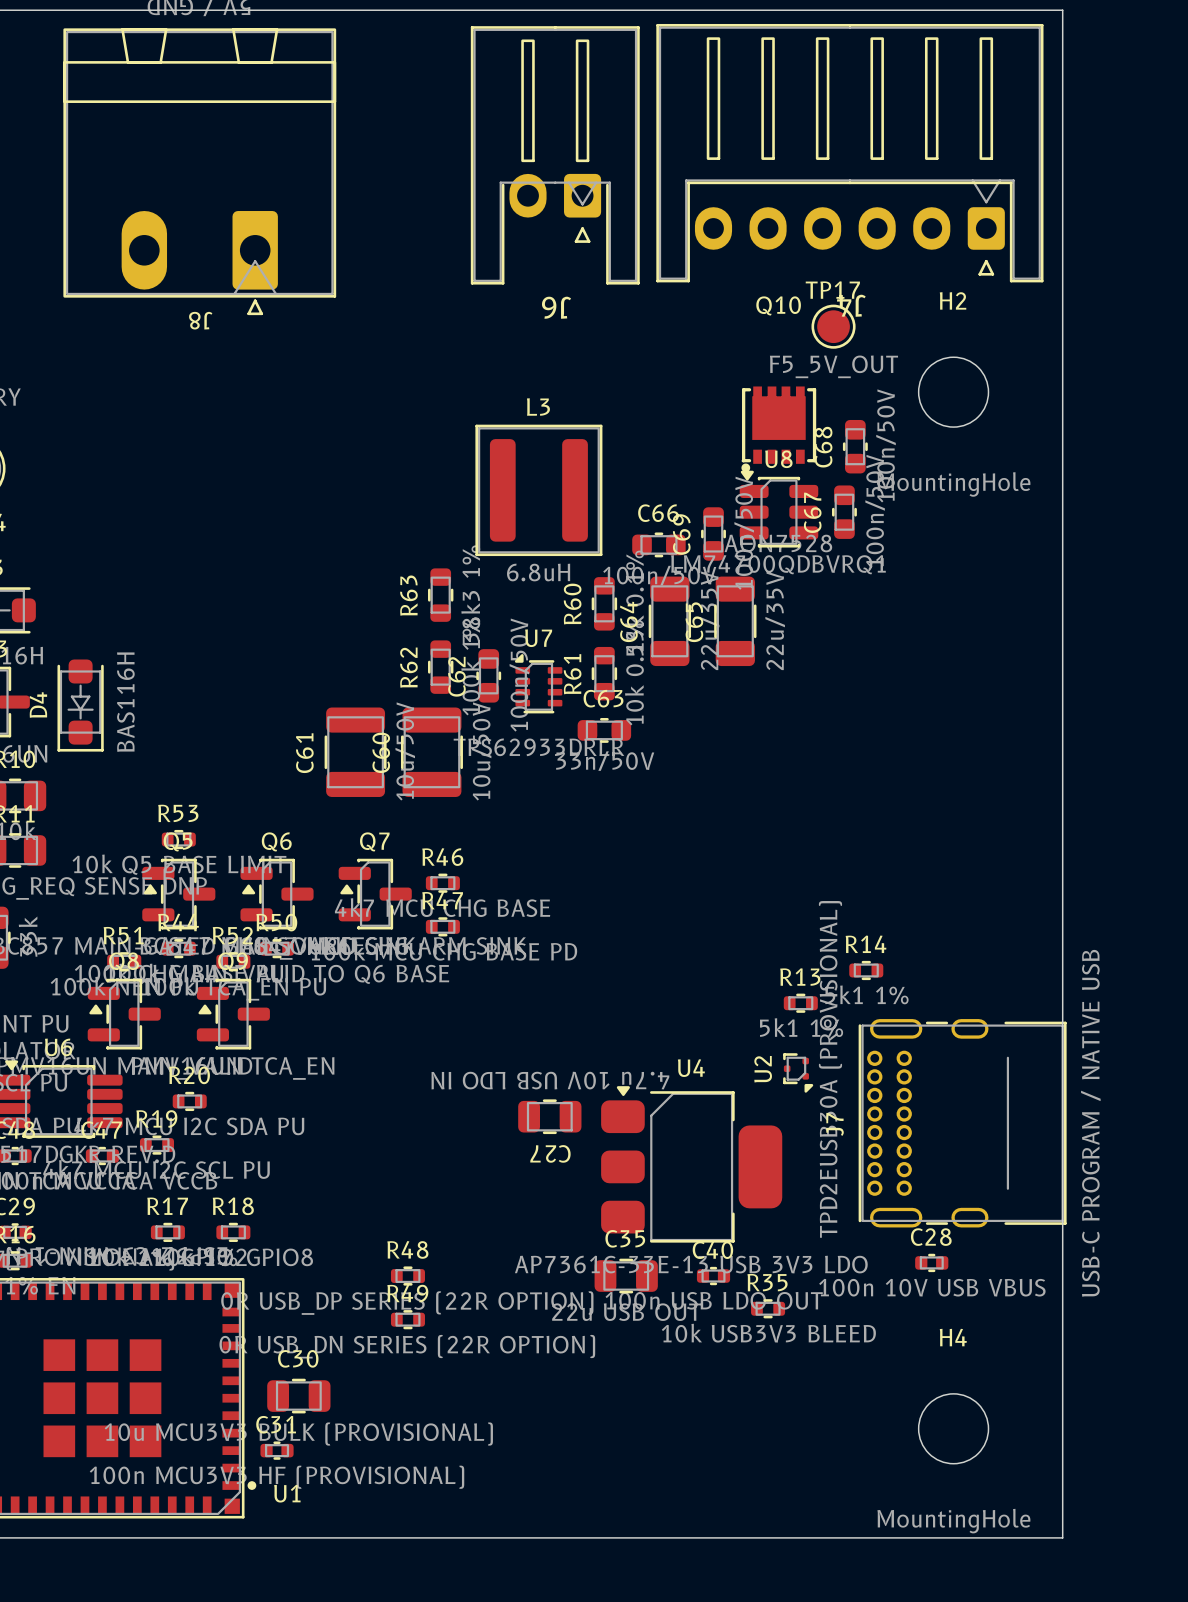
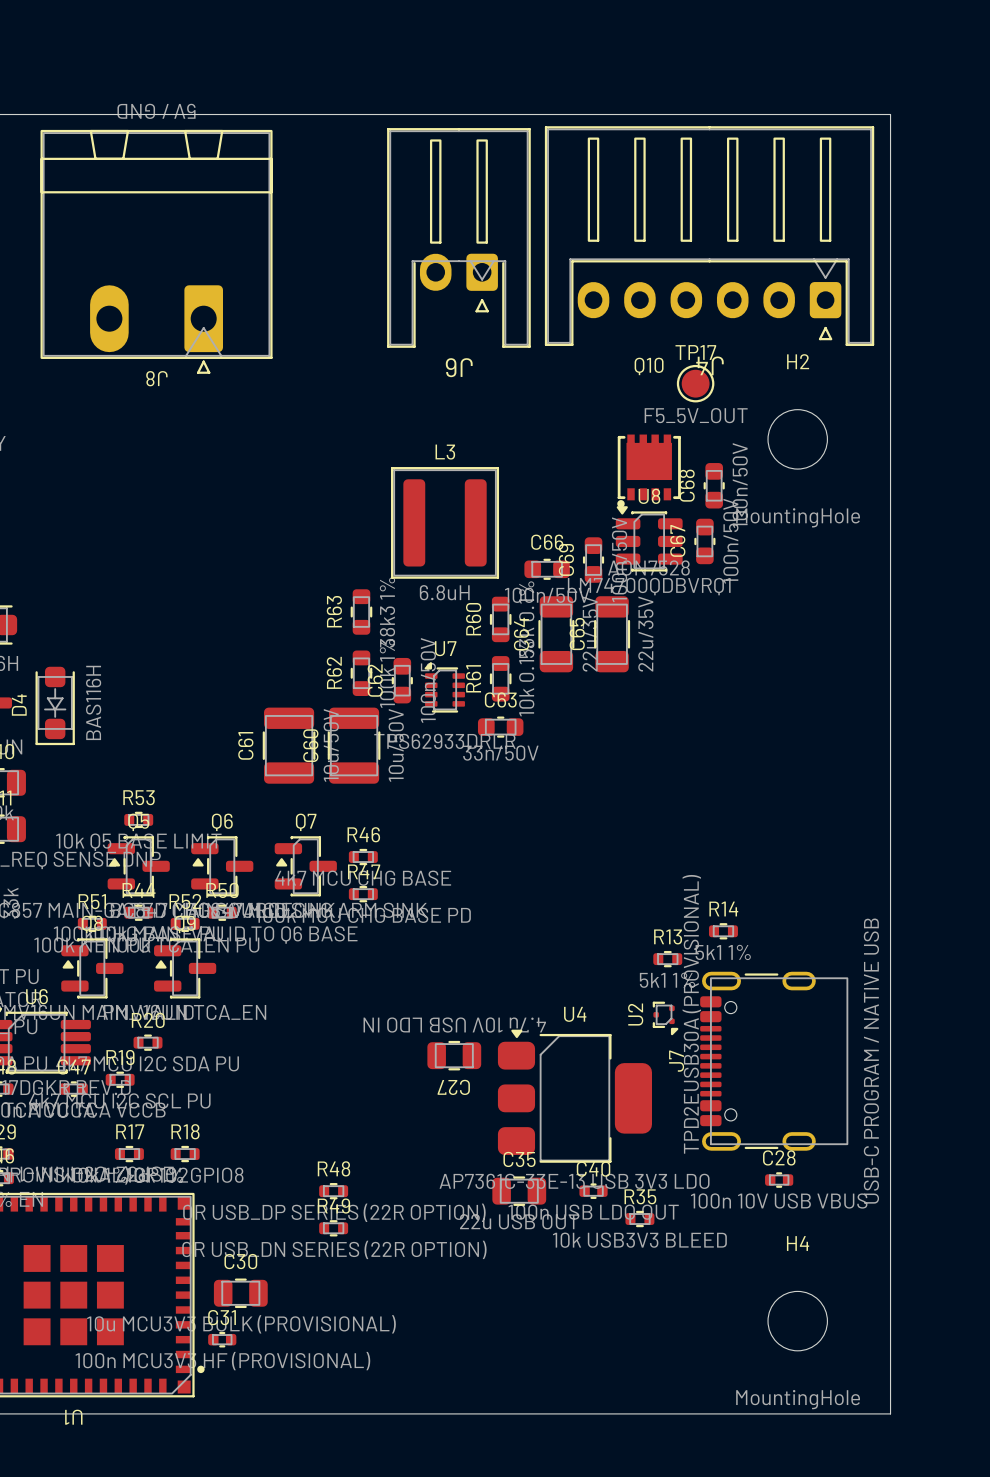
J7 footprint: [858, 1019, 1067, 1228] -> [700, 971, 849, 1151]
U1 name rotation: 0° (287, 1493) -> 180° (73, 1417)
U1 name position: U1 (287, 1493) -> U1 (73, 1417)

